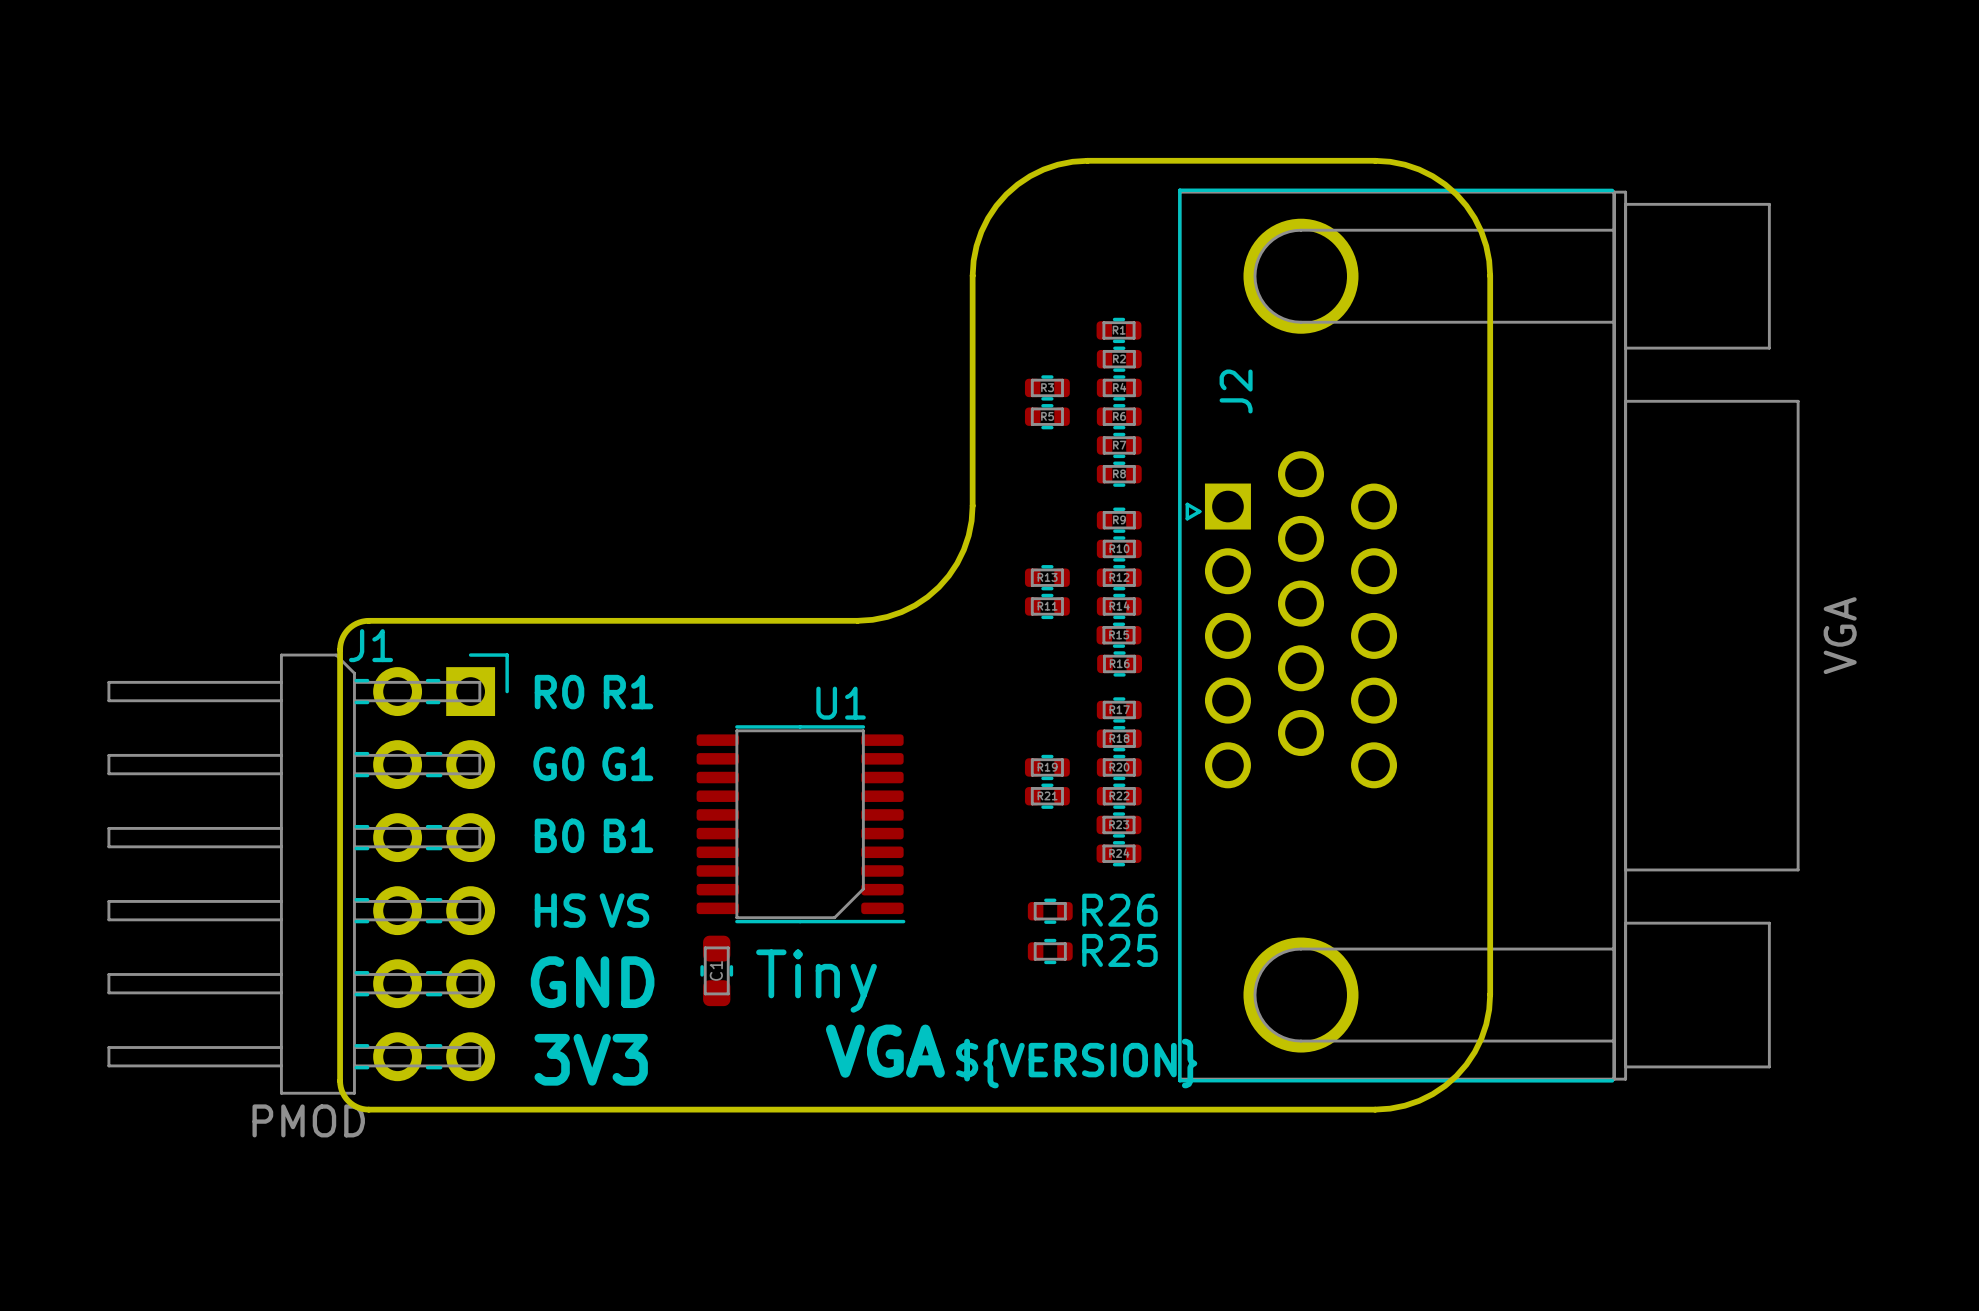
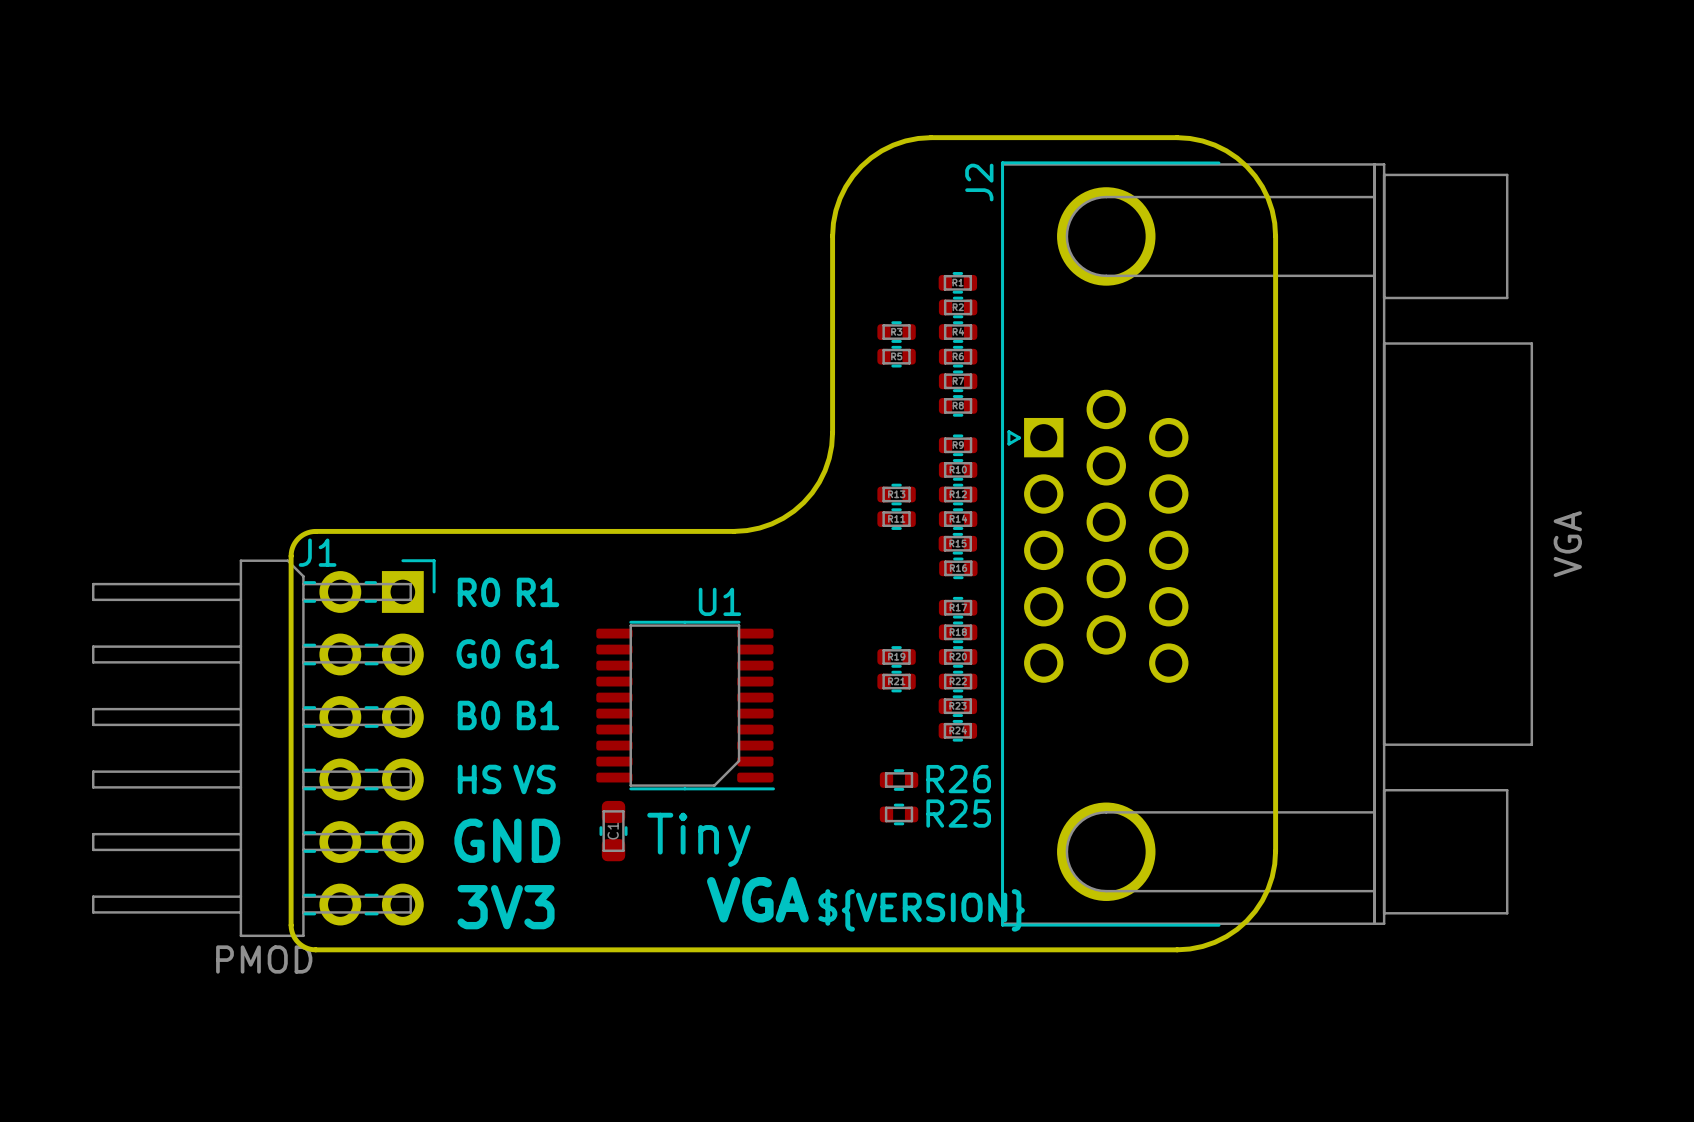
J2 footprint: [1178, 188, 1800, 1083] -> [1001, 161, 1534, 927]
J2 name position: J2 (1236, 391) -> J2 (979, 182)

